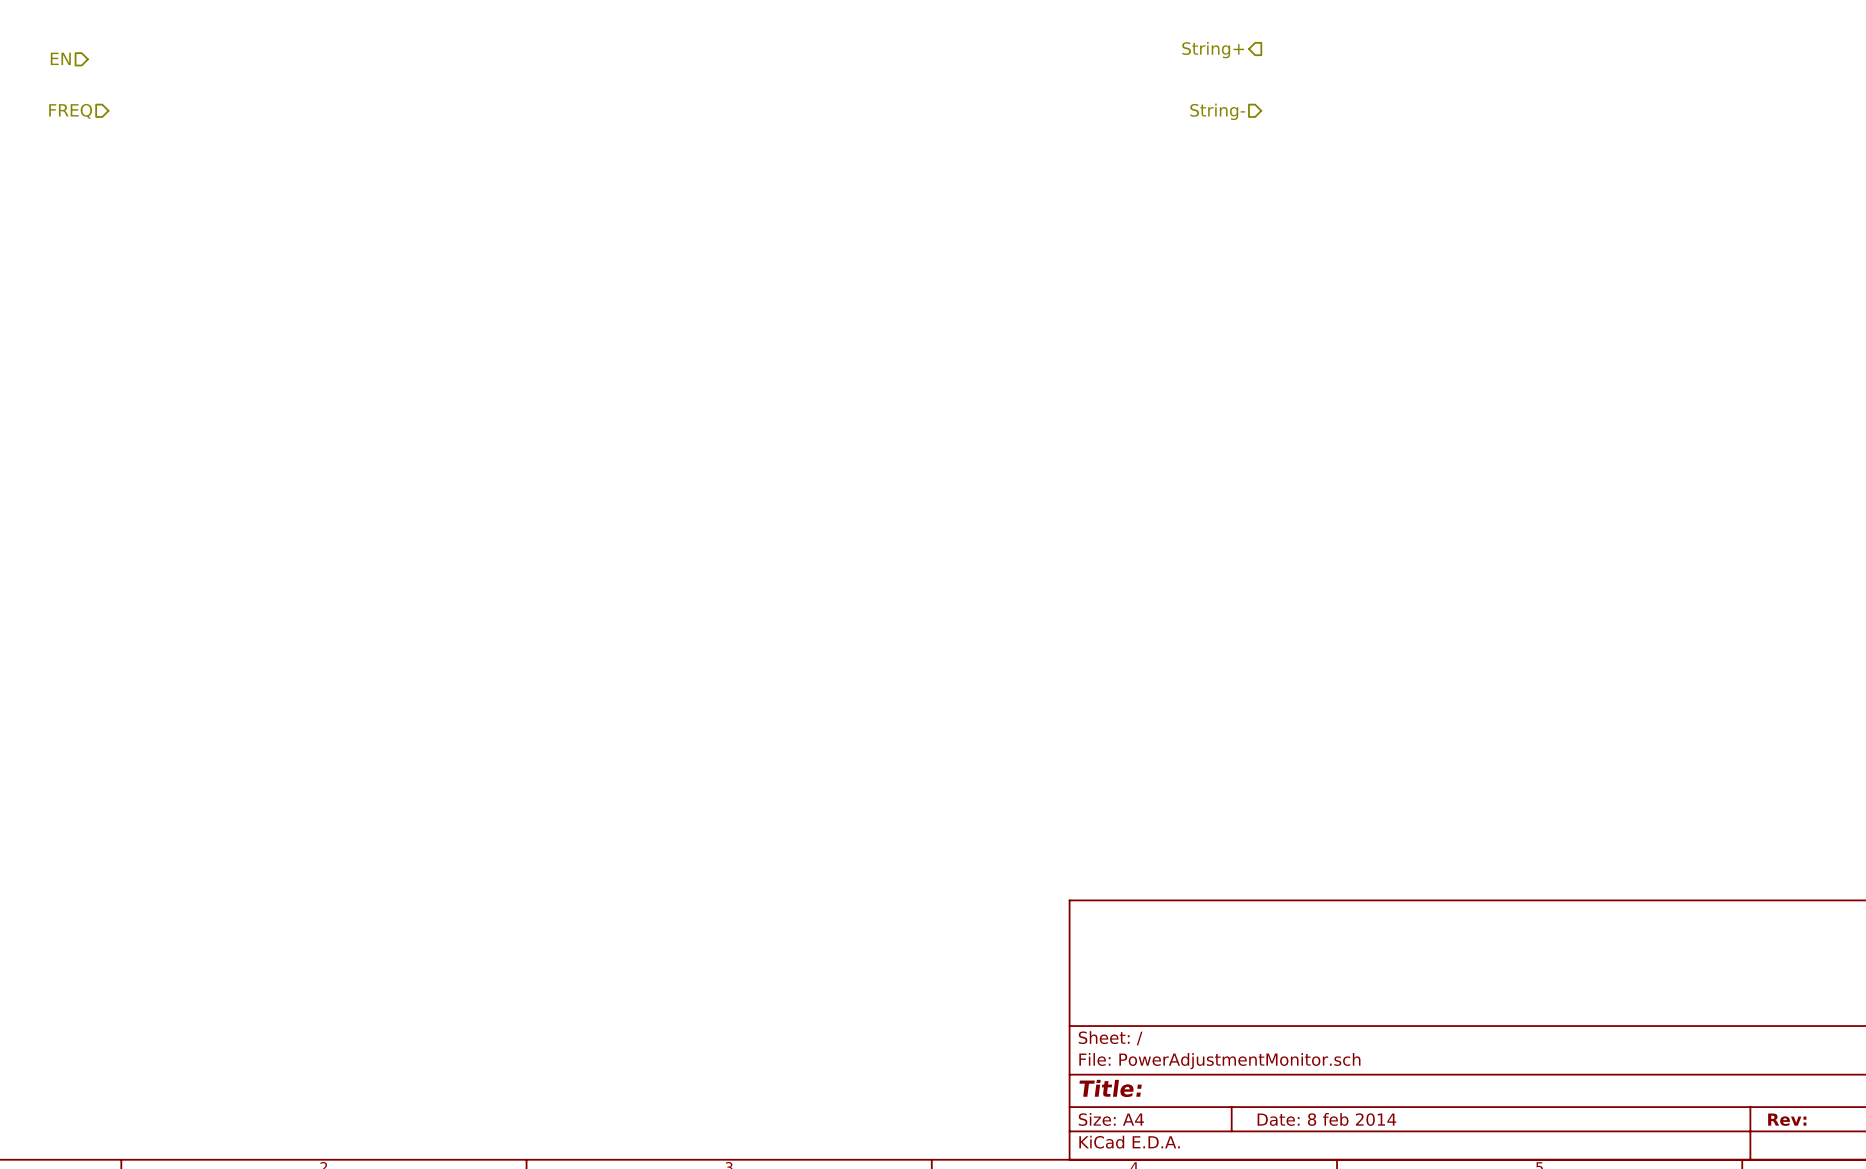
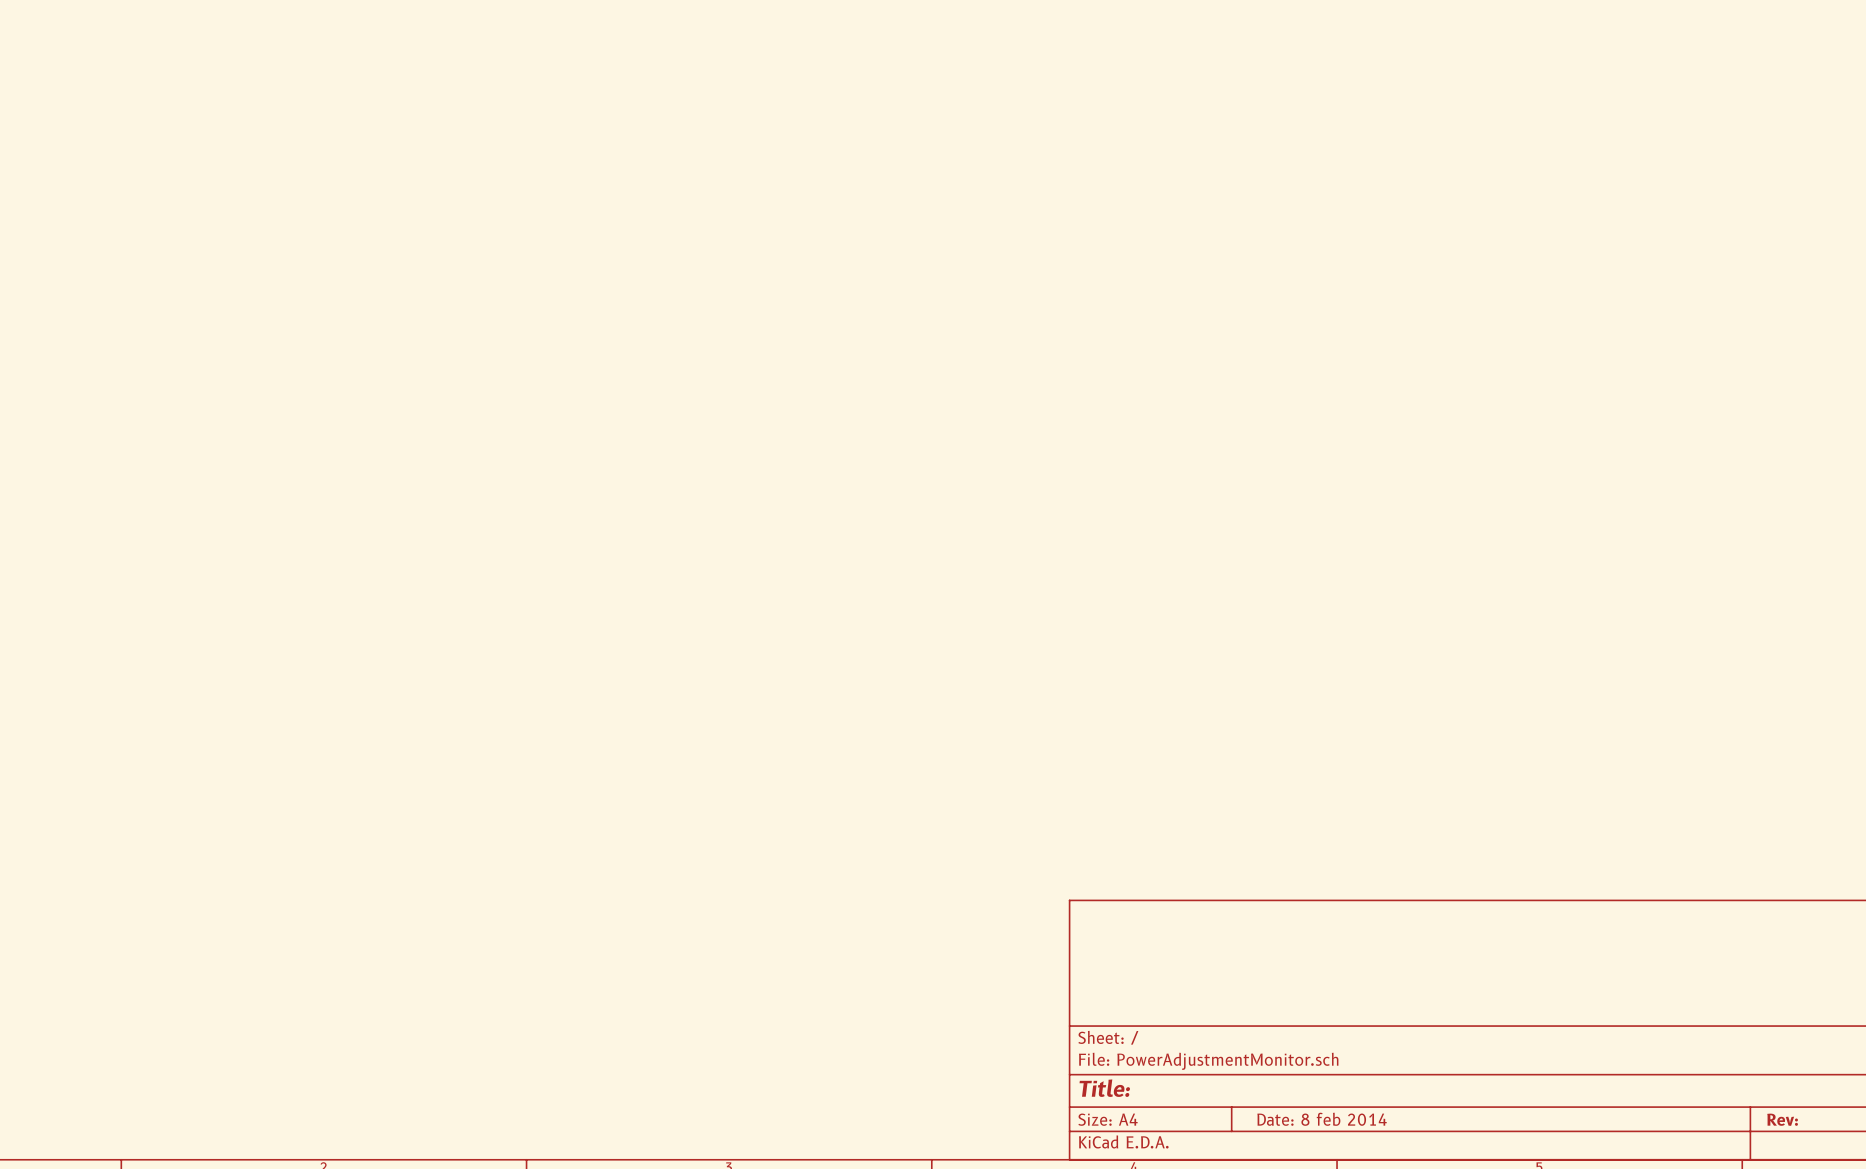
hierarchical label: String+ (1213, 50) -> none
hierarchical label: EN (60, 58) -> none
hierarchical label: FREQ (70, 111) -> none
hierarchical label: String- (1217, 111) -> none

